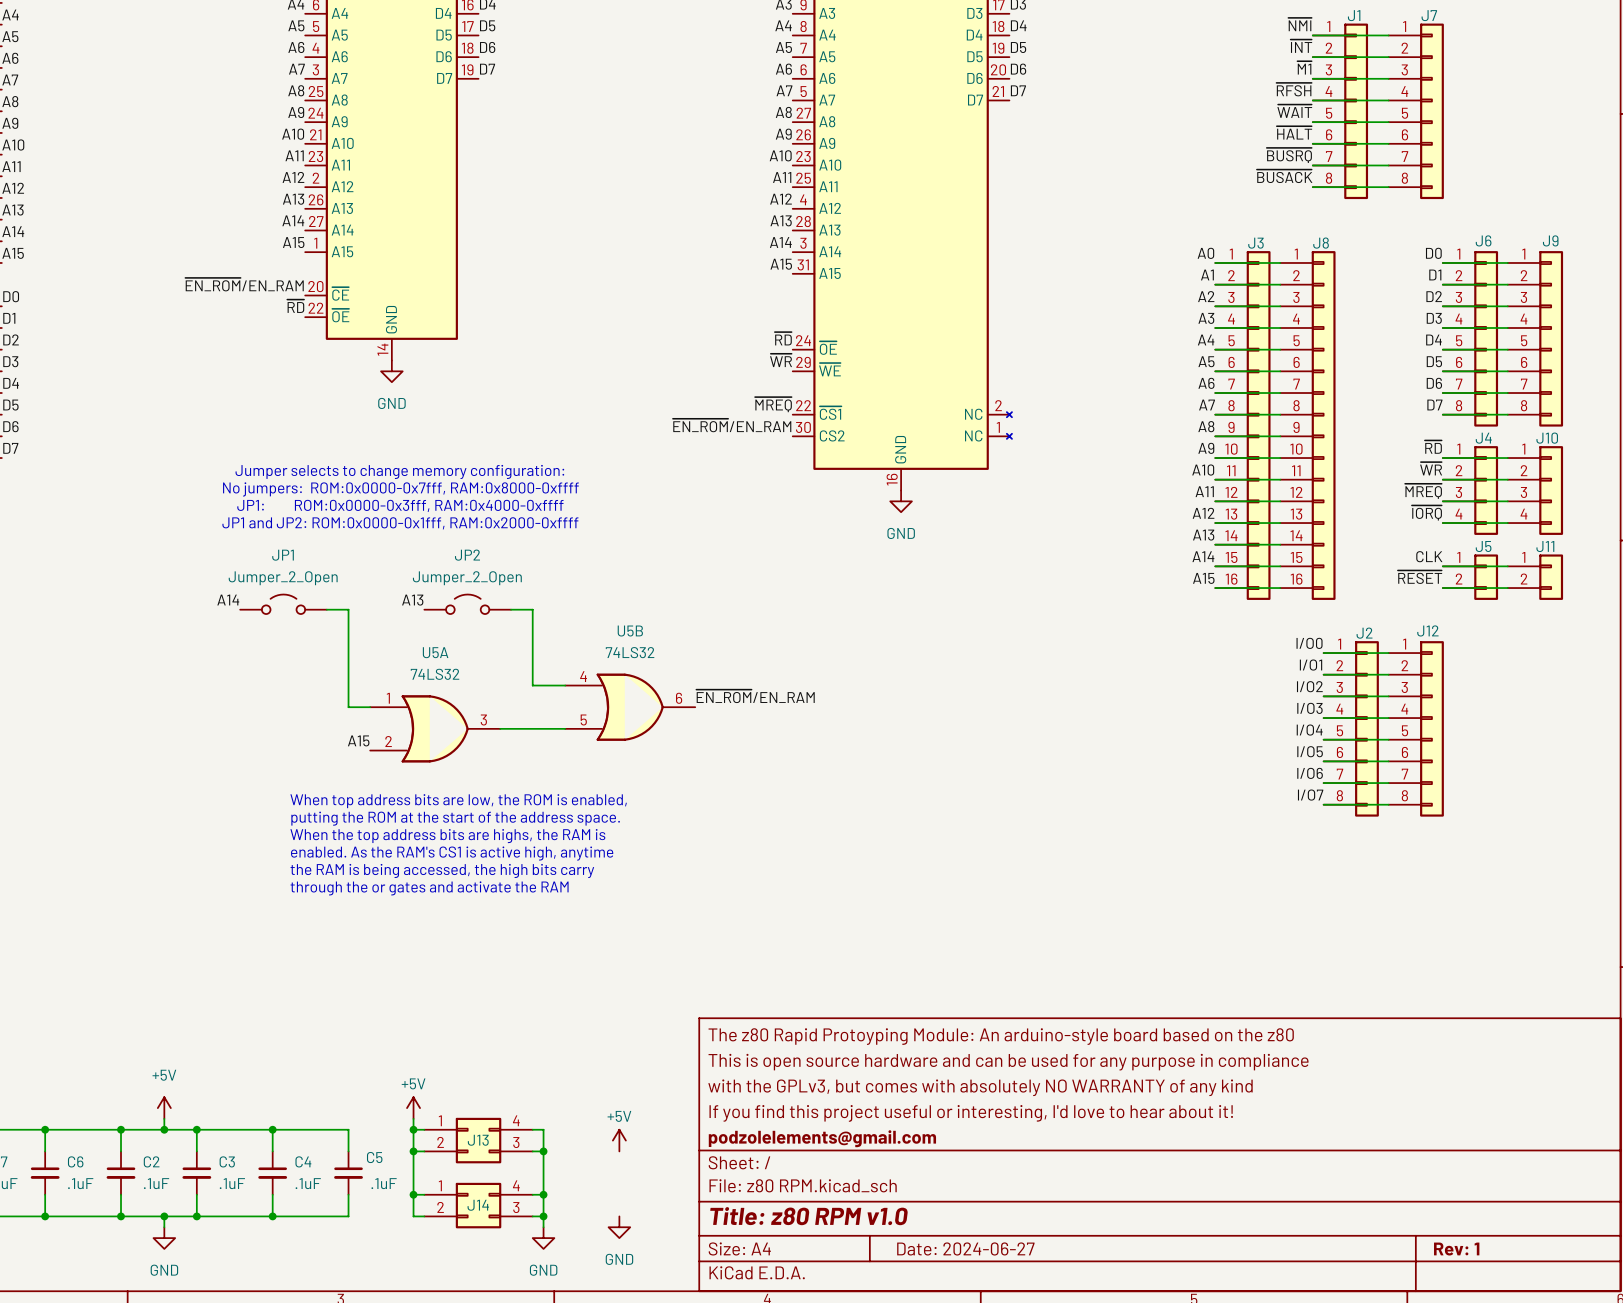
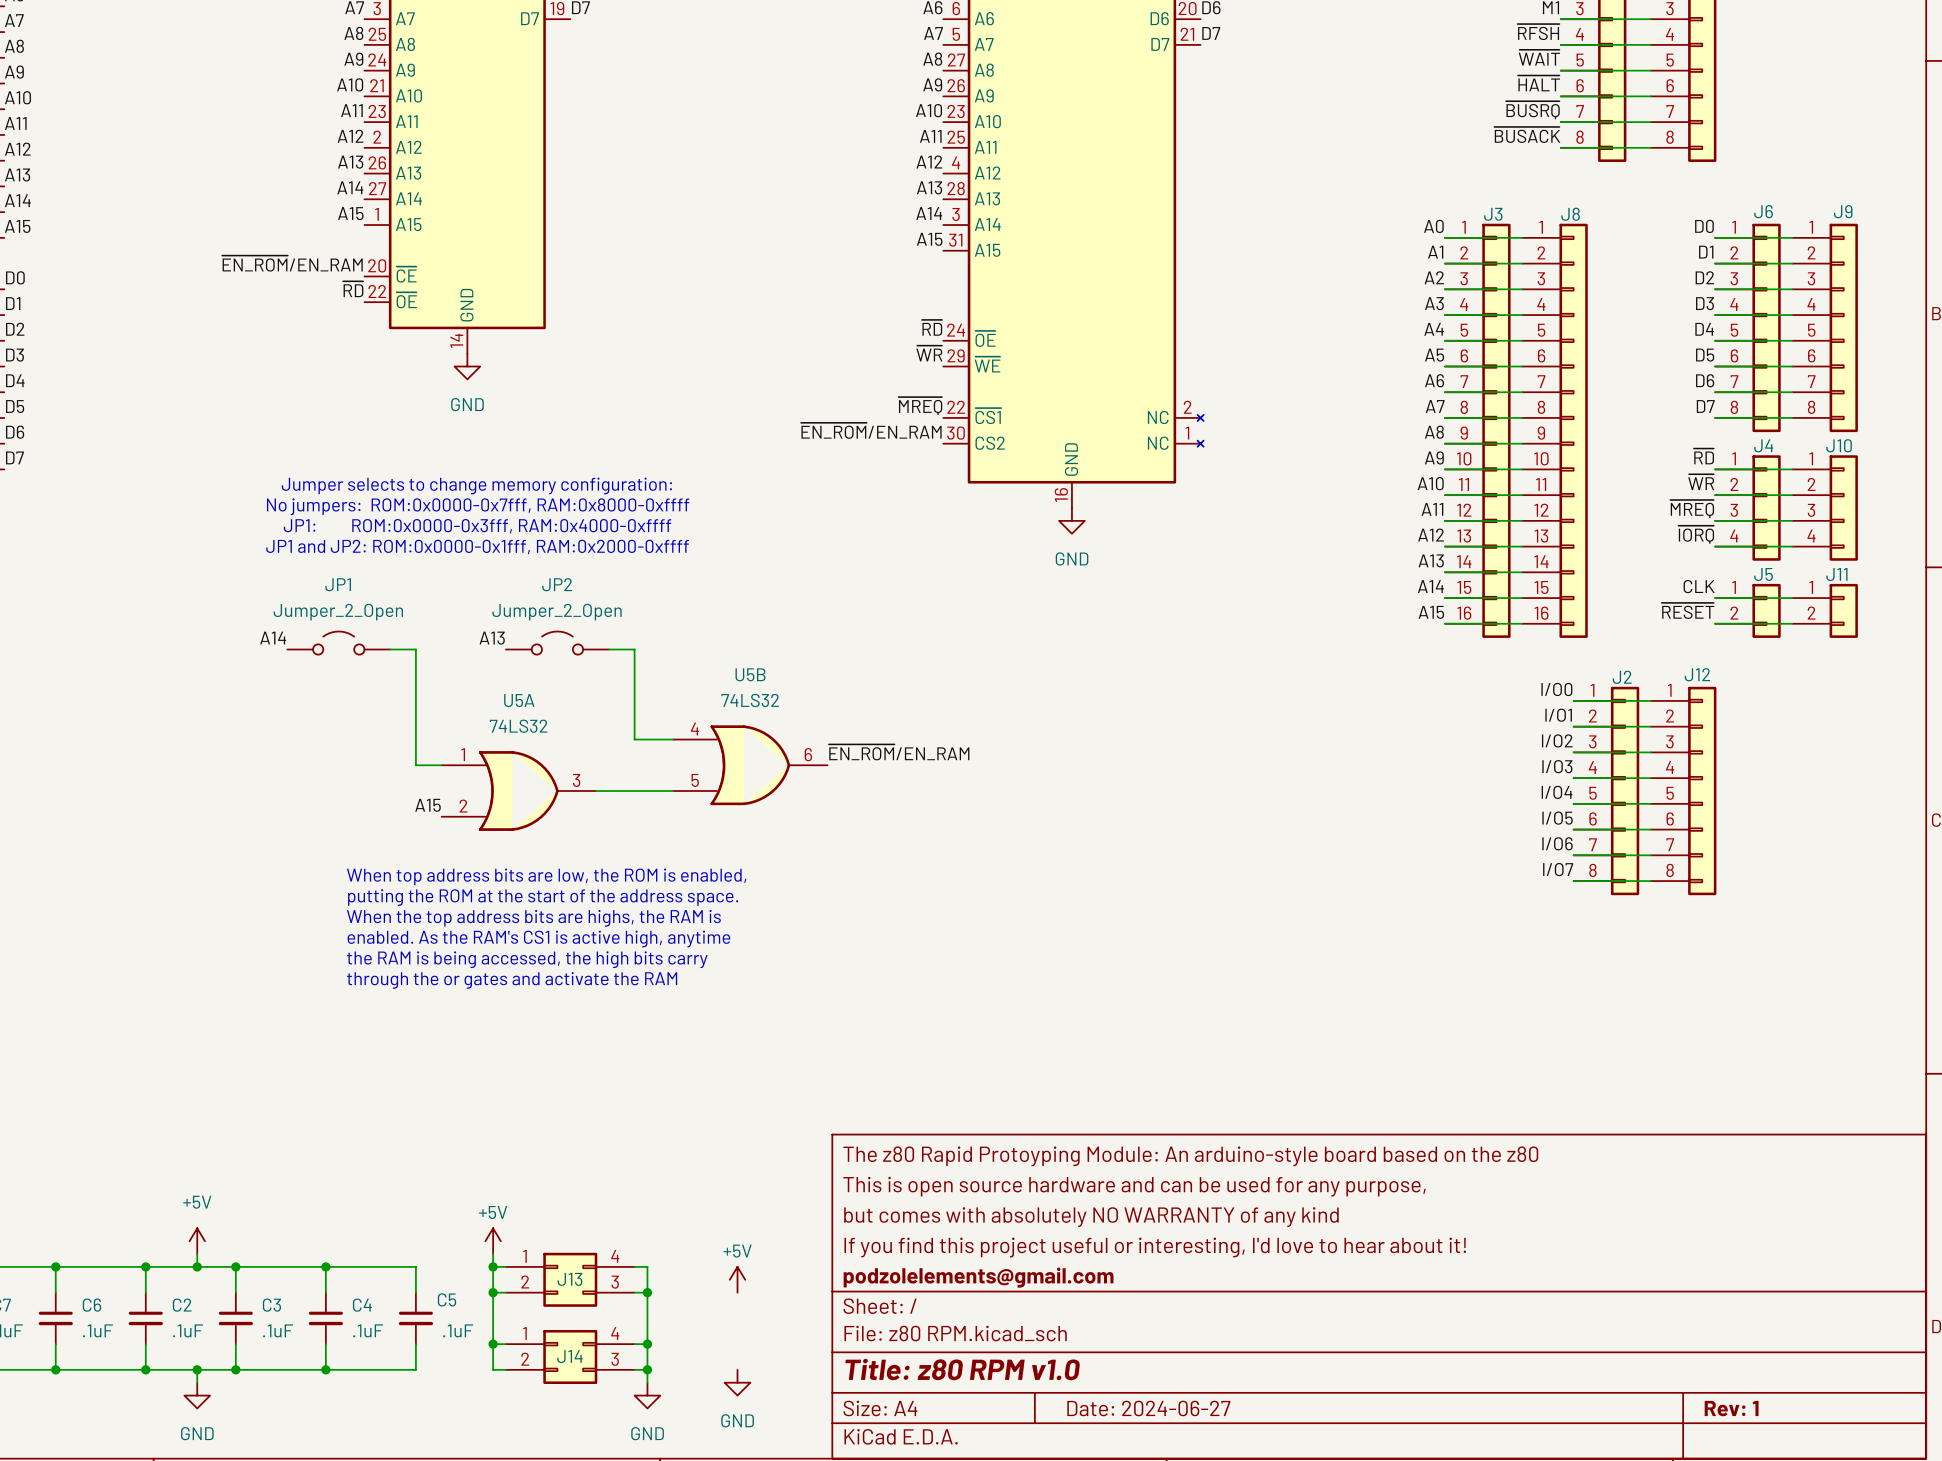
title block: This is open source hardware and can be used for any purpose in compliance (1008, 1062) -> This is open source hardware and can be used for any purpose, (1134, 1186)
title block: with the GPLv3, but comes with absolutely NO WARRANTY of any kind (980, 1087) -> but comes with absolutely NO WARRANTY of any kind (1091, 1217)

